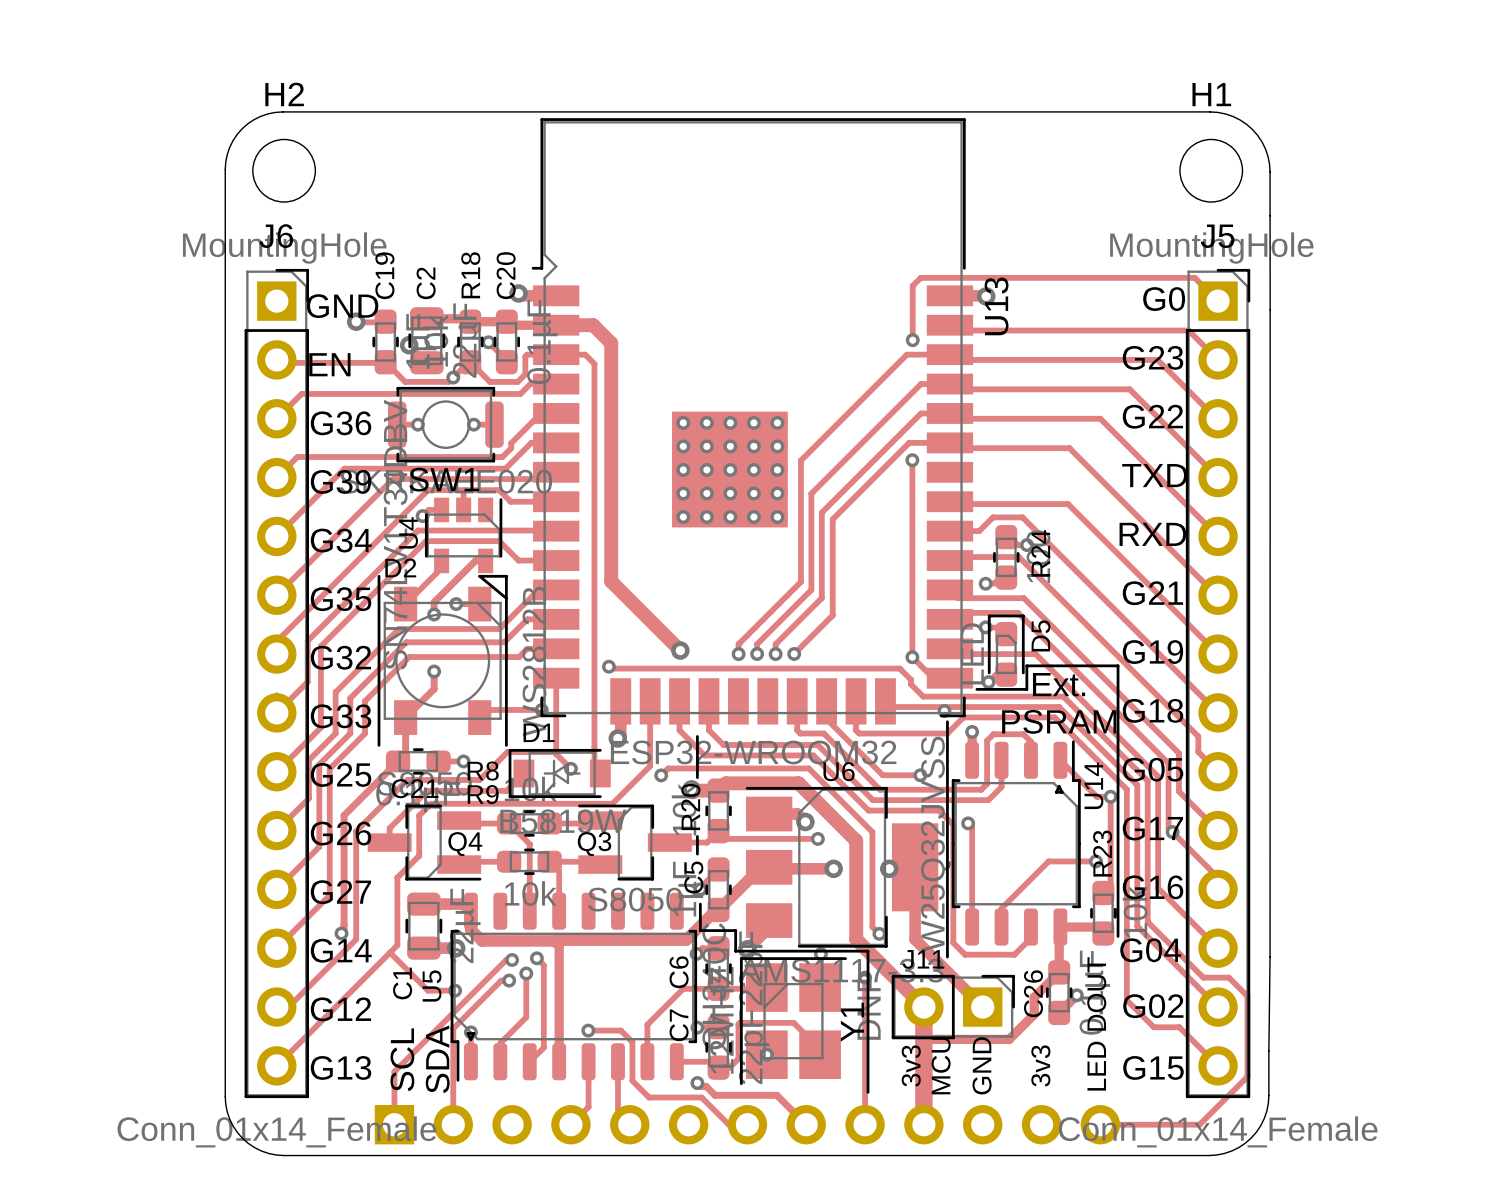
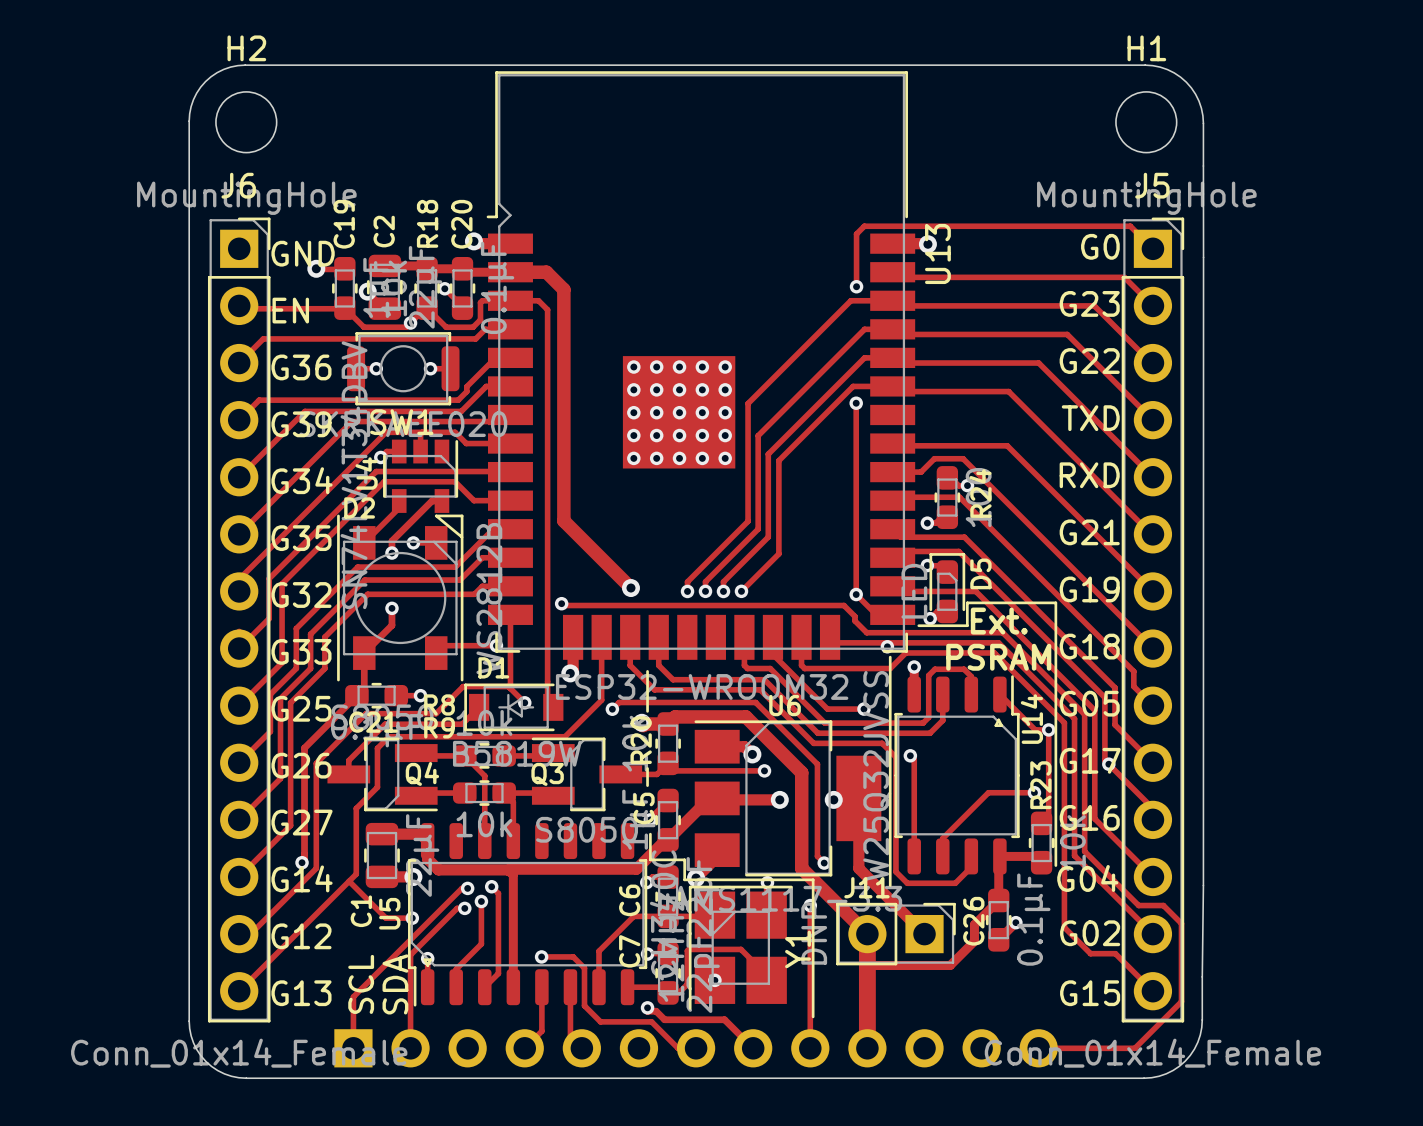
text: LED DOUT (1096, 1023) -> none
text: 3v3 (911, 1065) -> none
text: MCU (941, 1065) -> none
text: GND (982, 1065) -> none
text: 3v3 (1040, 1065) -> none

